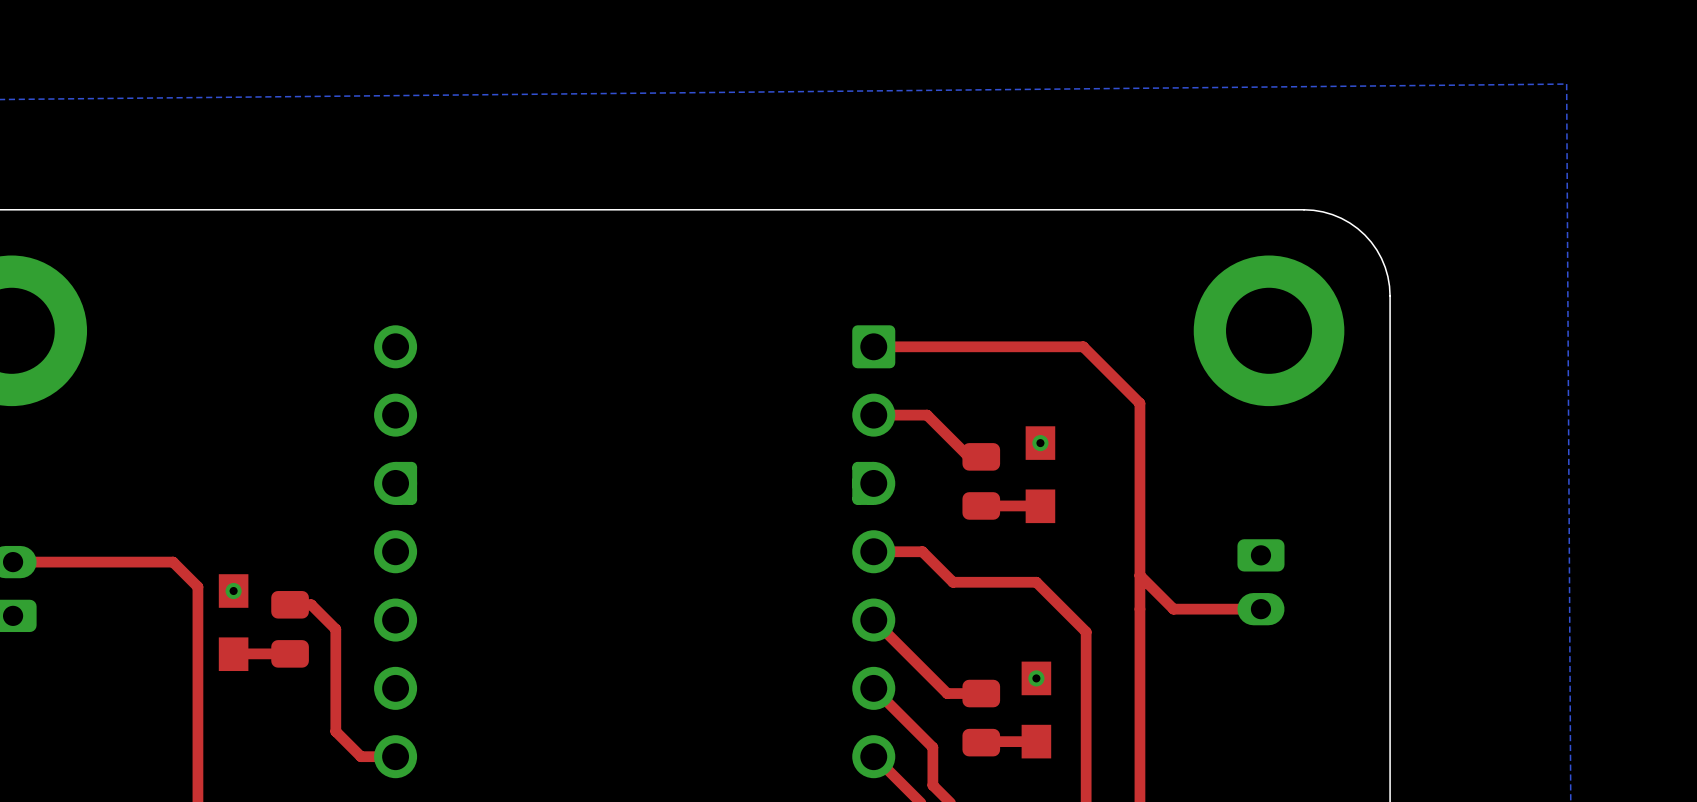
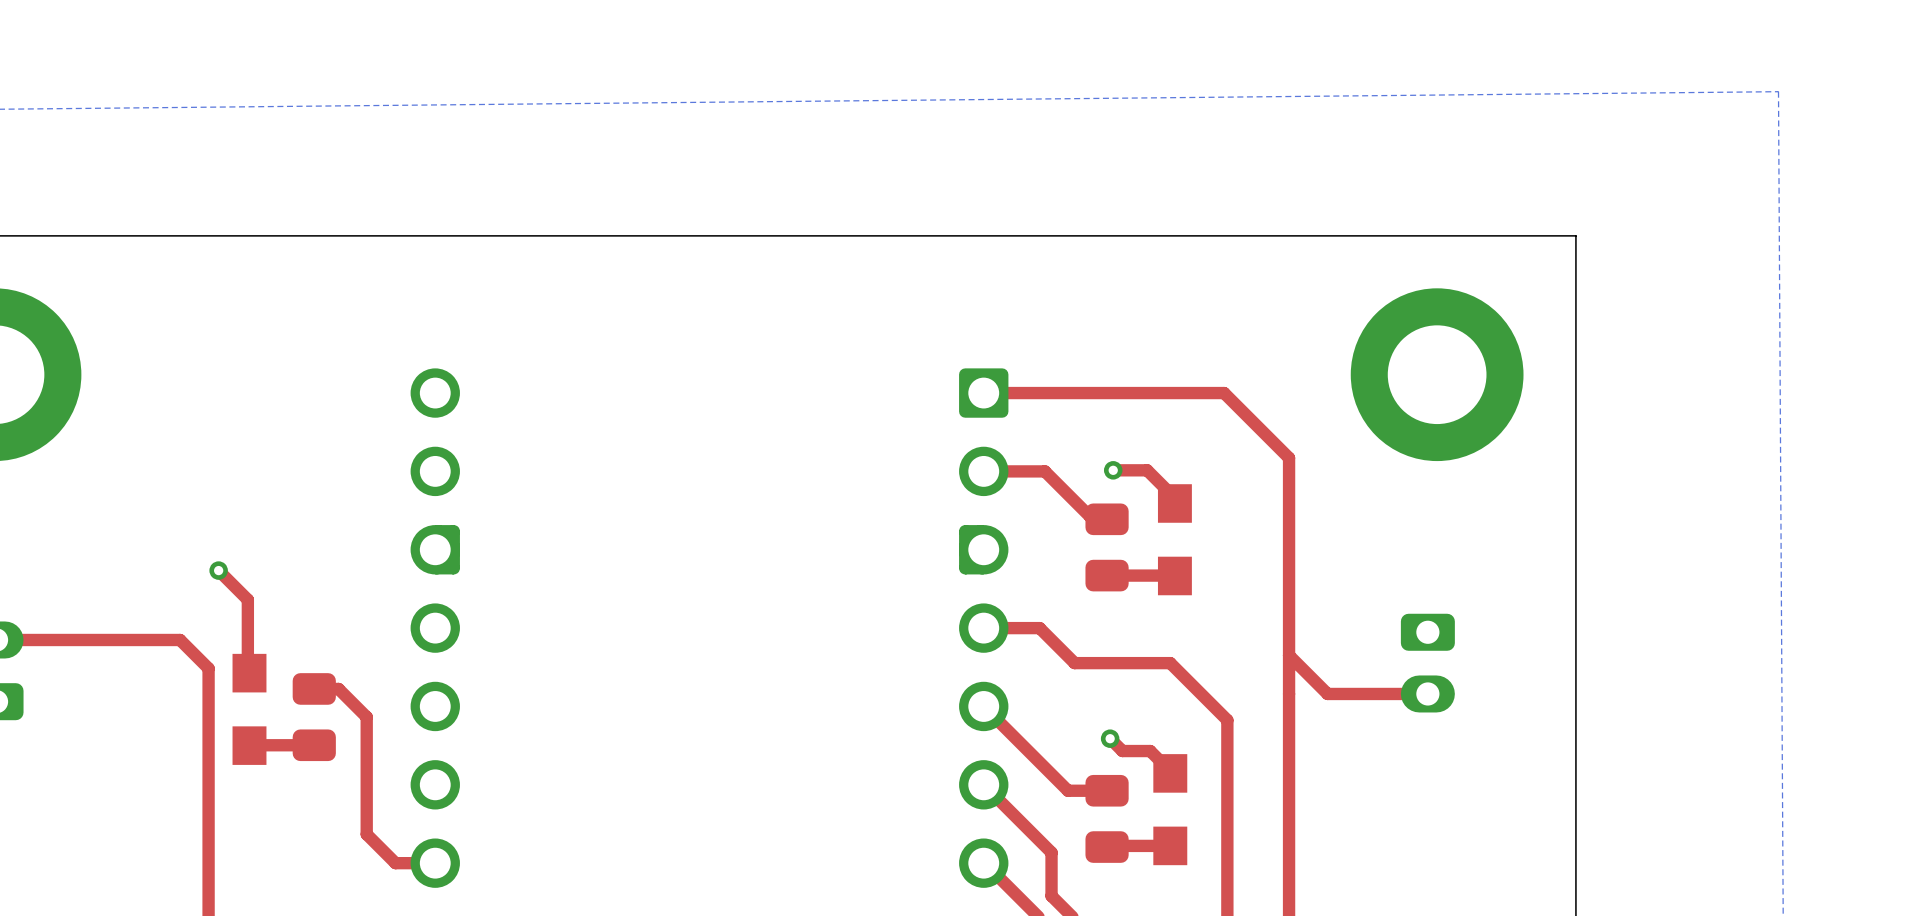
board edge: (1304, 209) (1332, 214) (1349, 222) (1364, 234) (1381, 258) (1387, 276) (1390, 295) -> (1477, 235) (1575, 235) (1575, 334)
top track: none -> (1113, 470) (1147, 470) (1176, 499)
via position: (1040, 443) -> (1113, 470)
top track: none -> (218, 570) (247, 599) (247, 668)
via position: (233, 591) -> (218, 570)
top track: none -> (1110, 738) (1122, 751) (1150, 751) (1171, 772)
via position: (1036, 678) -> (1110, 738)

